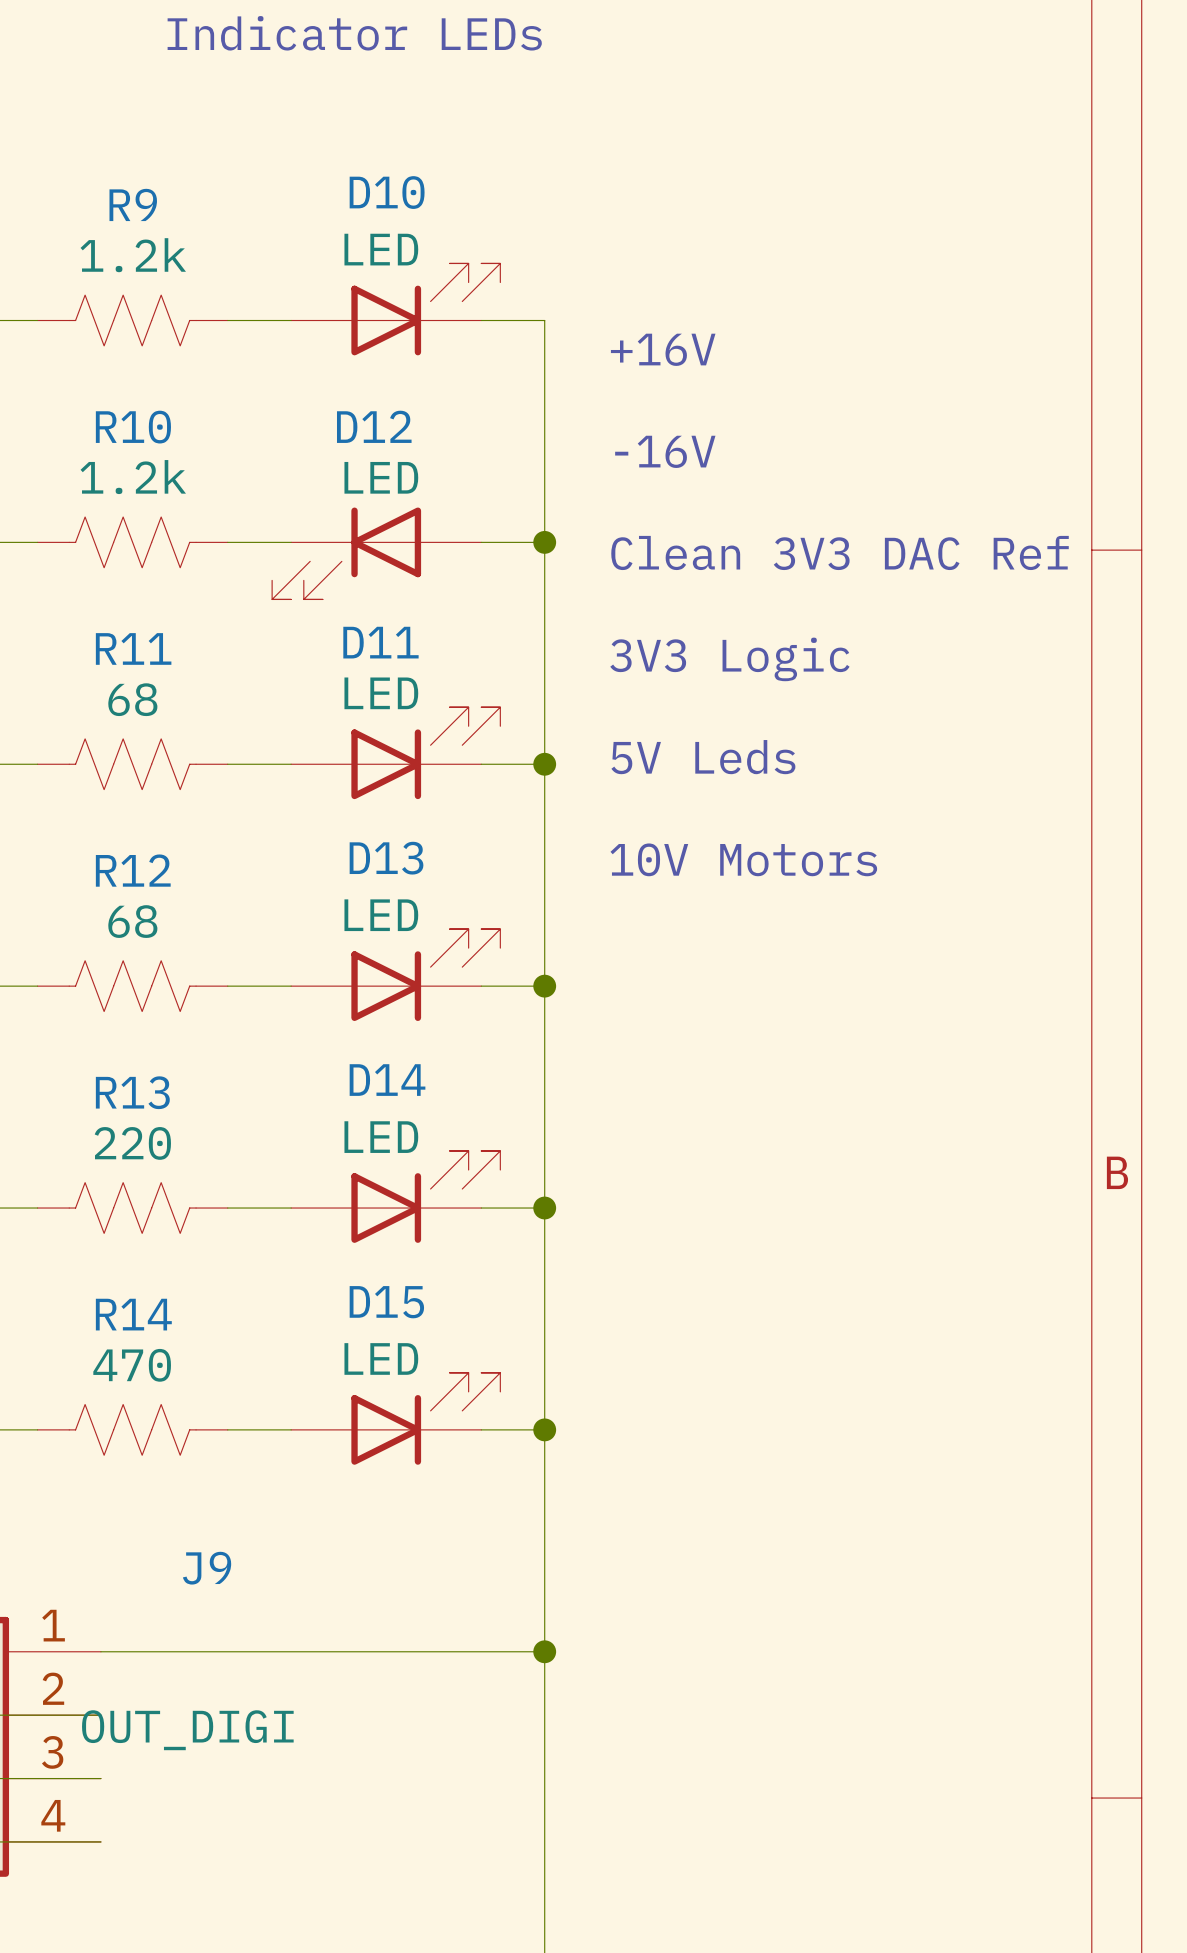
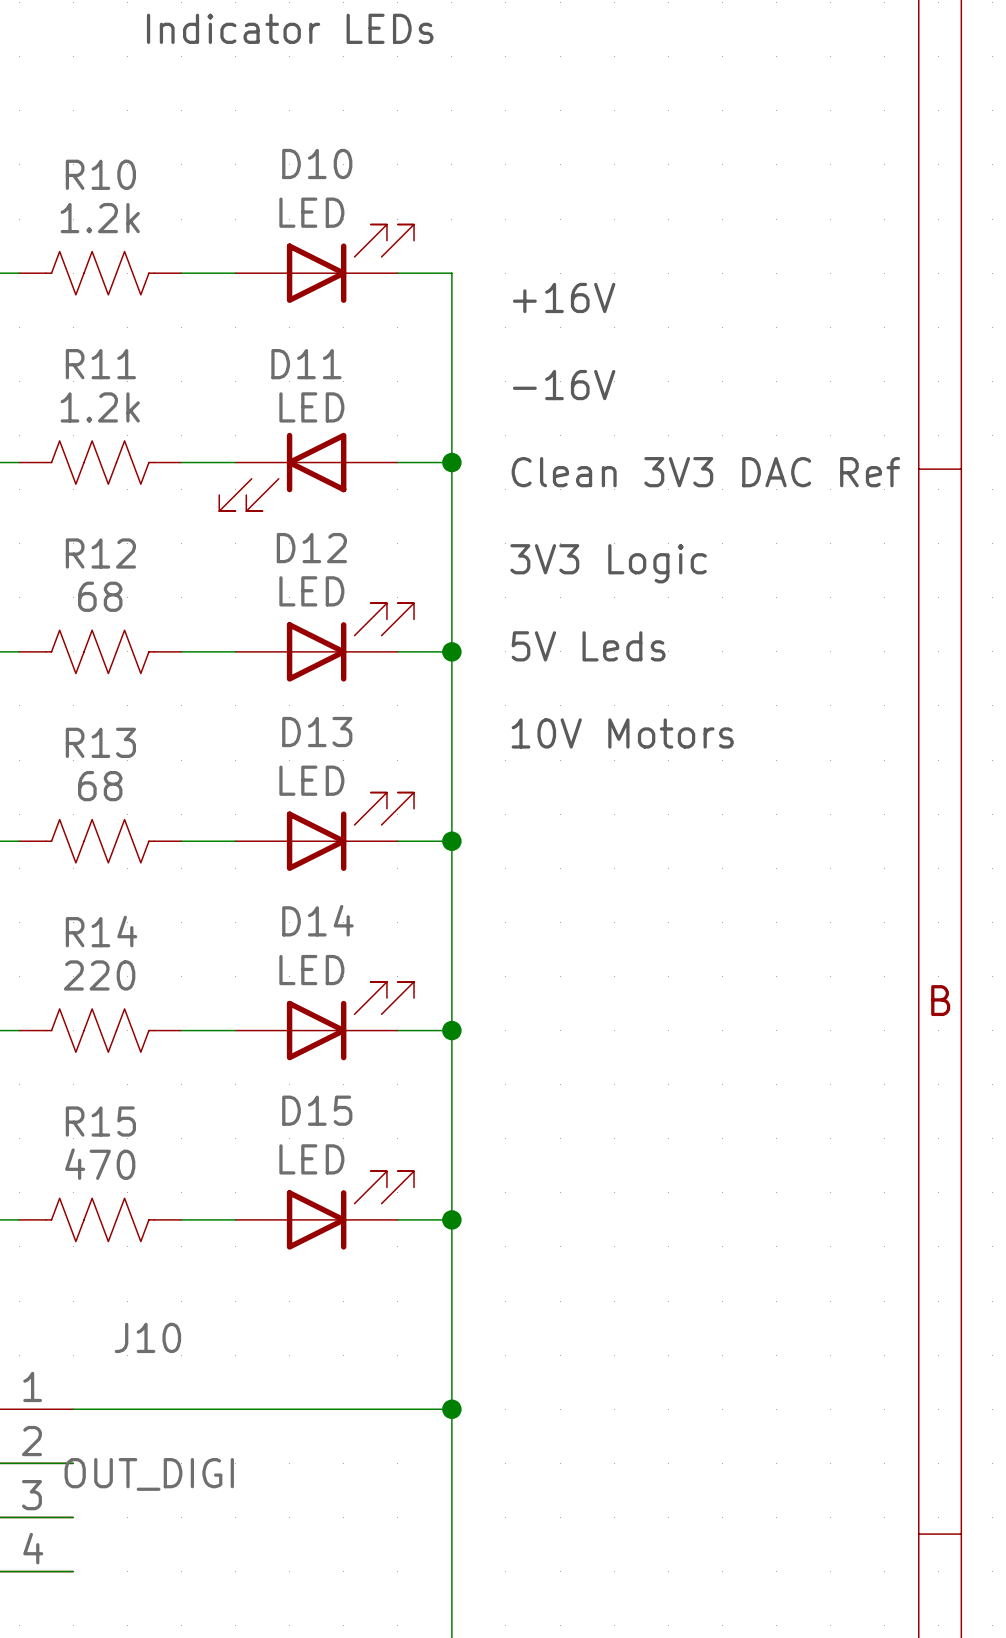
R9 name: R9 (133, 204) -> R10 (100, 174)
D12 name: D12 (374, 426) -> D11 (306, 364)
R10 name: R10 (133, 427) -> R11 (100, 364)
D11 name: D11 (380, 642) -> D12 (311, 548)
R11 name: R11 (133, 648) -> R12 (100, 553)
R12 name: R12 (133, 870) -> R13 (100, 742)
R13 name: R13 (132, 1092) -> R14 (101, 931)
R14 name: R14 (133, 1314) -> R15 (100, 1121)
J9 name: J9 (207, 1568) -> J10 (147, 1337)

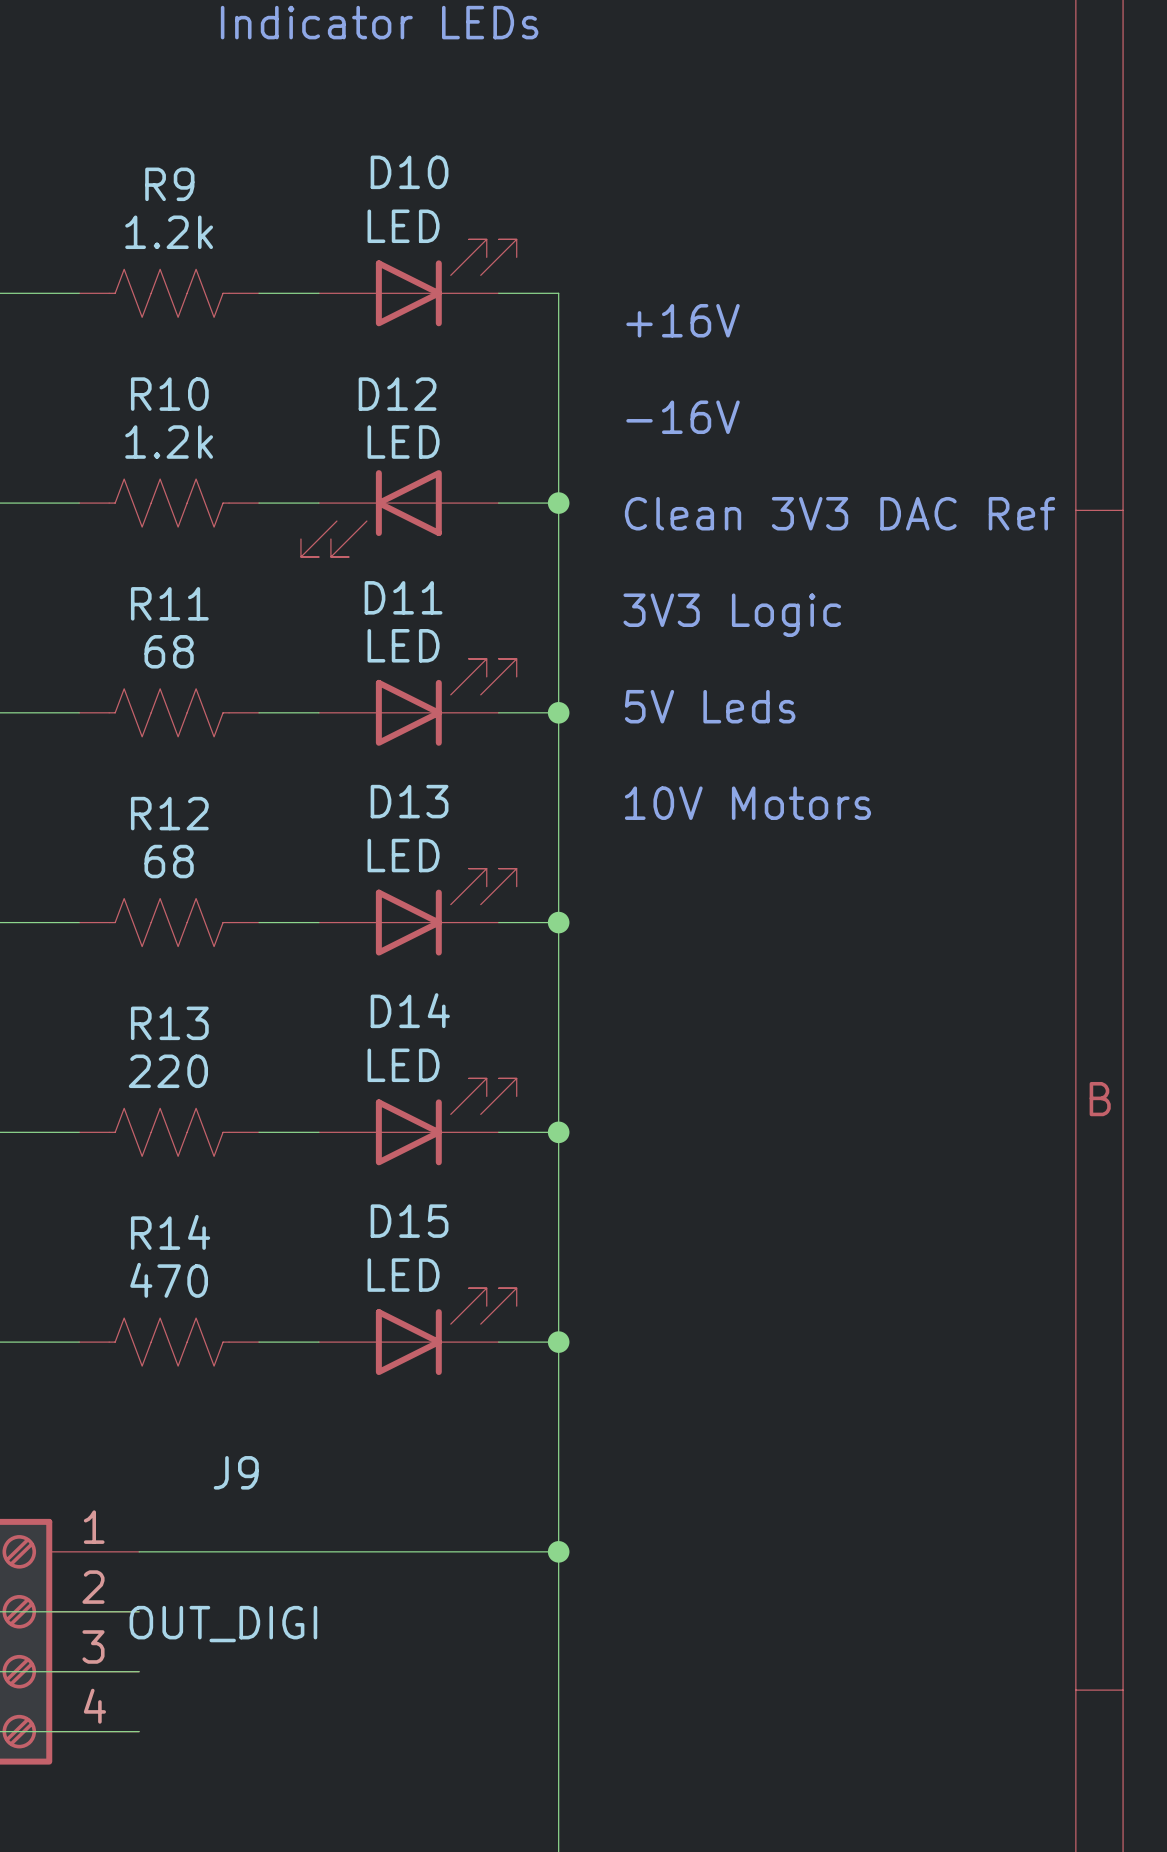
R10 name: R10 (100, 174) -> R9 (169, 184)
R11 name: R11 (100, 364) -> R10 (169, 394)
D11 name: D11 (306, 364) -> D12 (397, 394)
D12 name: D12 (311, 548) -> D11 (403, 597)
R12 name: R12 (100, 553) -> R11 (169, 603)
R13 name: R13 (100, 742) -> R12 (169, 813)
R14 name: R14 (101, 931) -> R13 (169, 1023)
R15 name: R15 (100, 1121) -> R14 (170, 1232)
J10 name: J10 (147, 1337) -> J9 (236, 1472)

